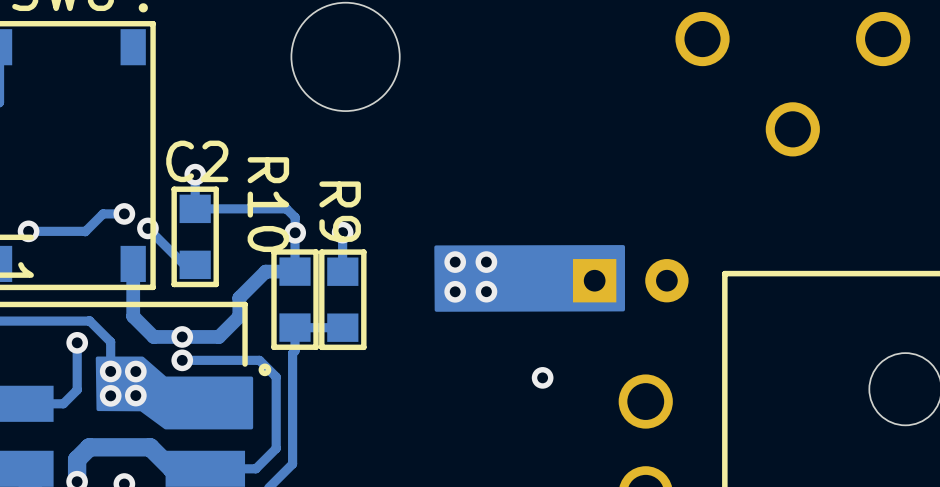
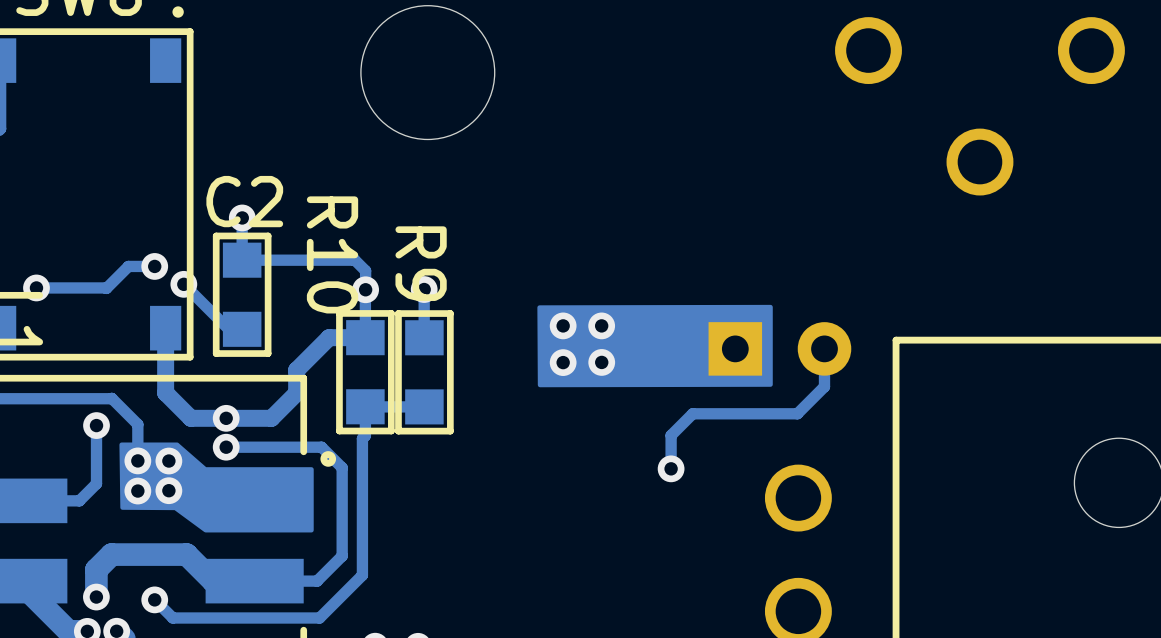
track: none -> (824, 348) (824, 386) (797, 413) (692, 413) (671, 435) (671, 468)

